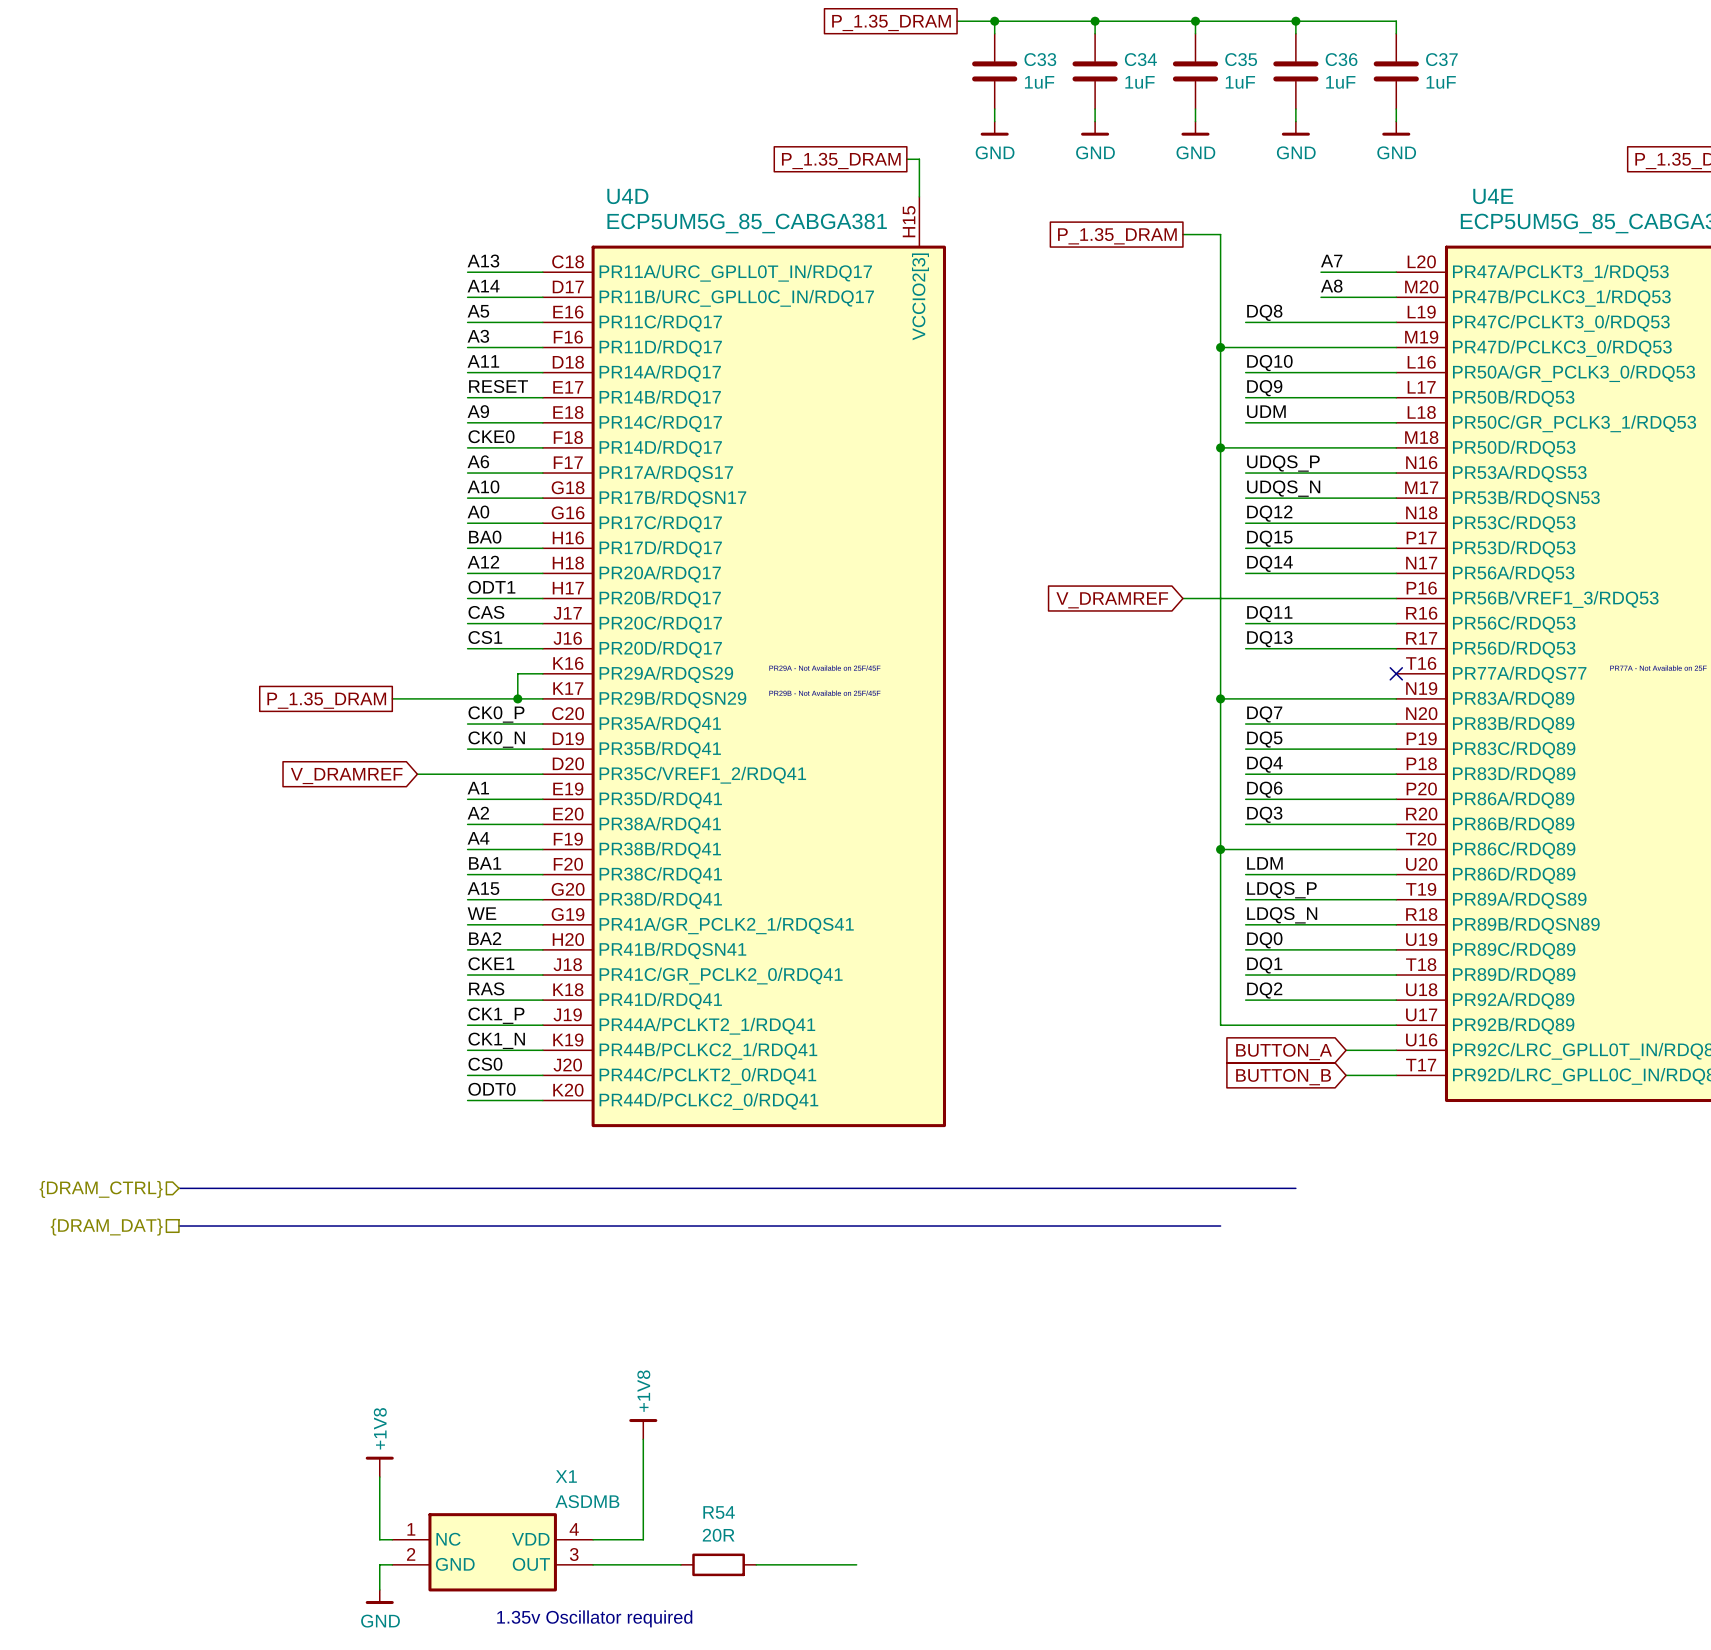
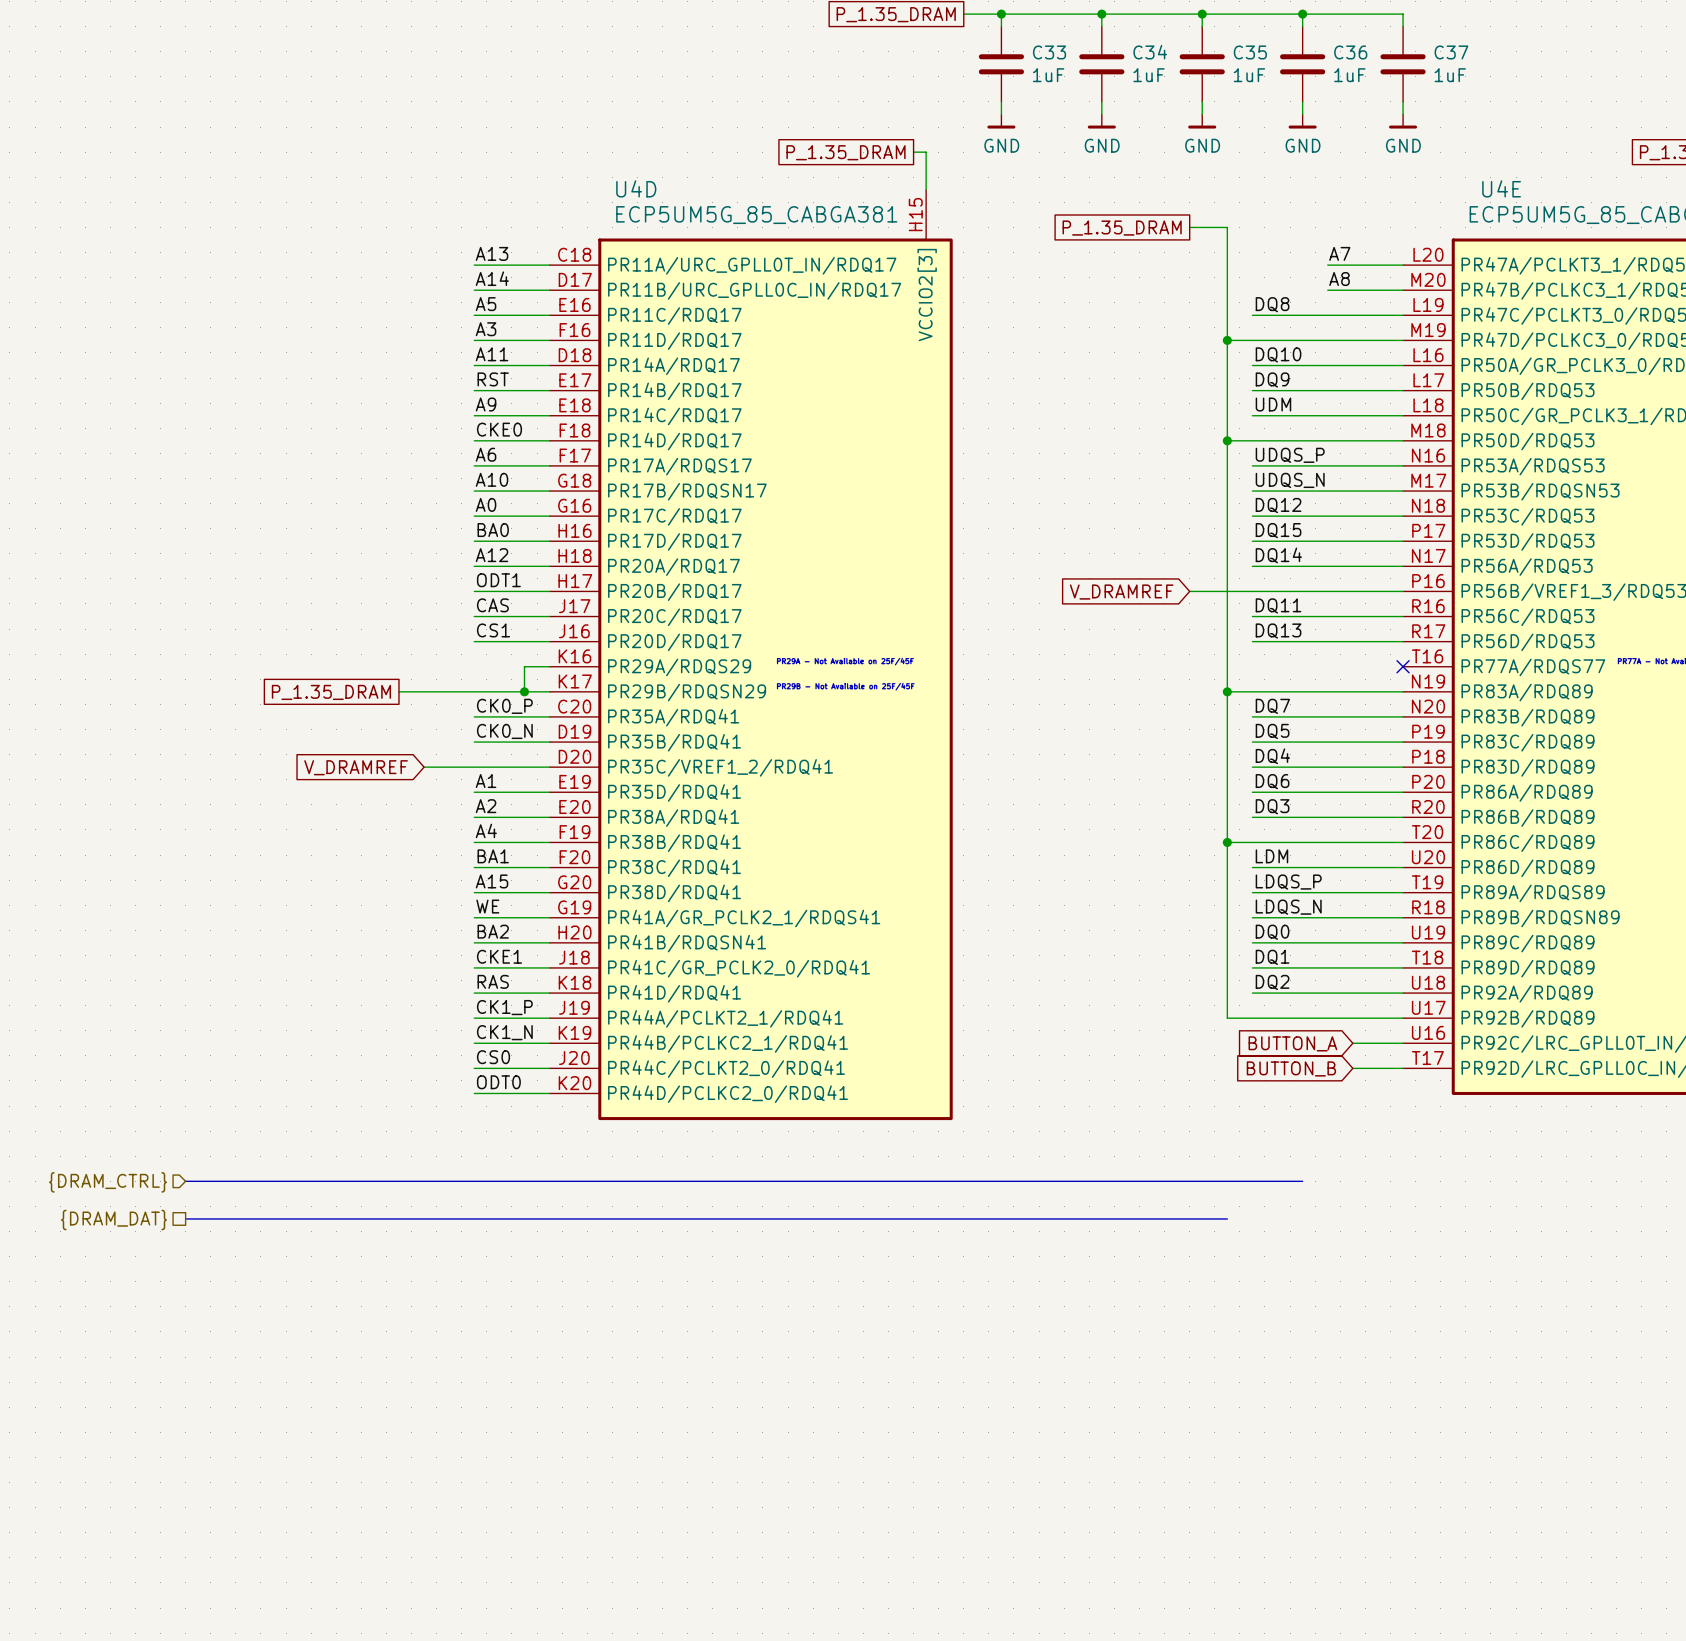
label: RESET (498, 386) -> RST (493, 379)
power symbol: +1V8 (643, 1429) -> none
wire: (643, 1439) (643, 1539) (593, 1539) -> none
power symbol: +1V8 (379, 1466) -> none
wire: (379, 1477) (379, 1539) (392, 1539) -> none
X1: ASDMB (492, 1552) -> none
wire: (392, 1564) (379, 1564) (379, 1589) -> none
wire: (593, 1564) (680, 1564) -> none
R54: 20R (718, 1564) -> none
wire: (756, 1564) (856, 1564) -> none
power symbol: GND (379, 1596) -> none
text: 1.35v Oscillator required (594, 1618) -> none

